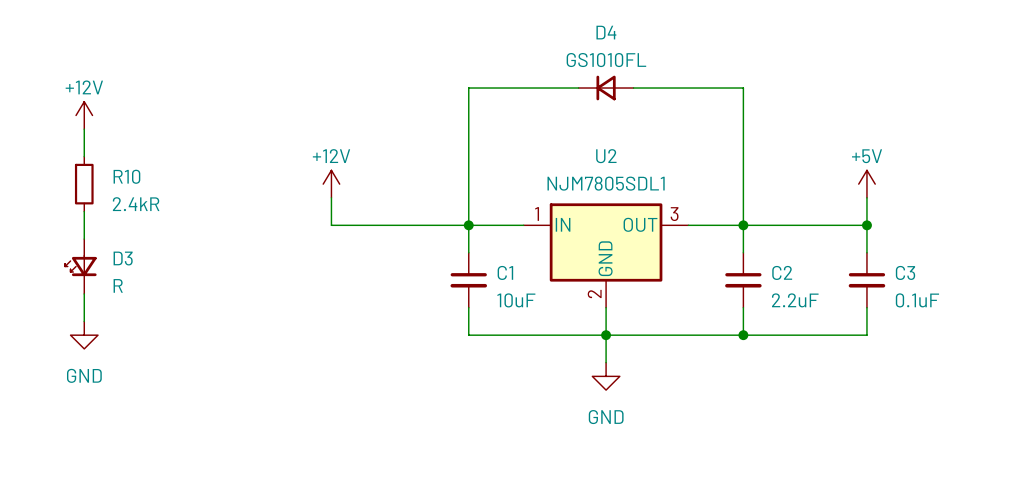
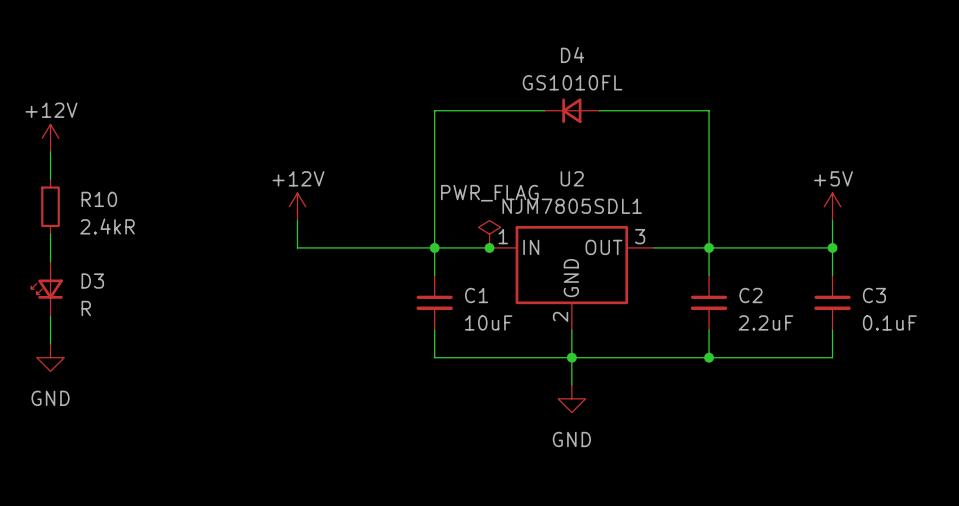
power symbol: none -> PWR_FLAG (489, 234)
junction: none -> (489, 247)

